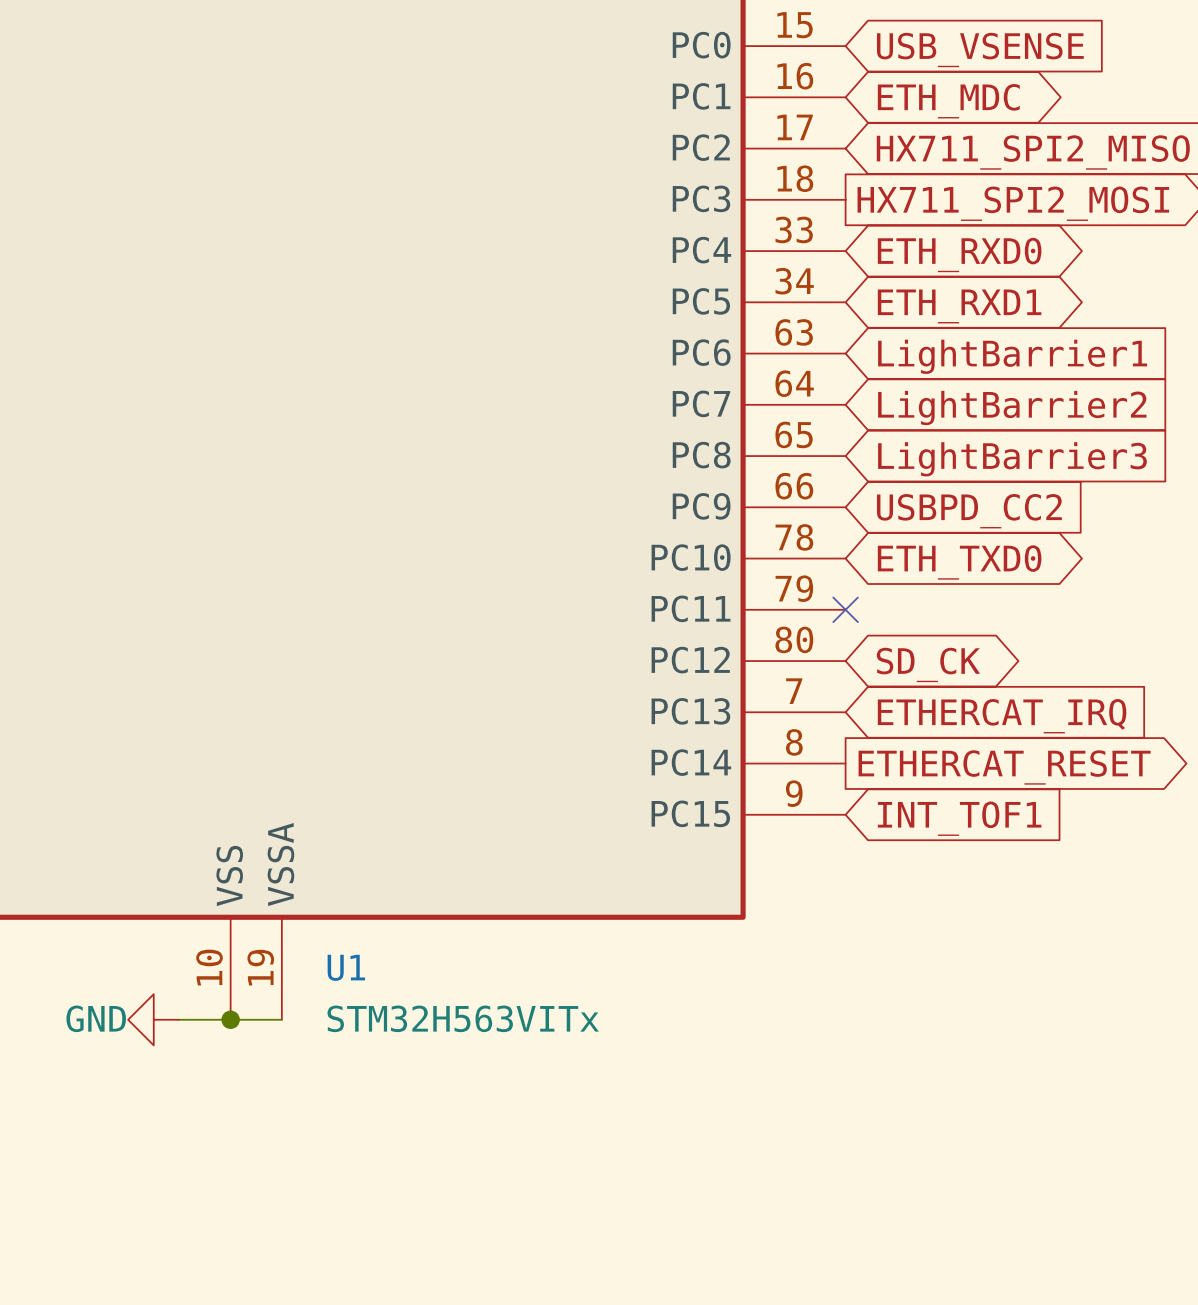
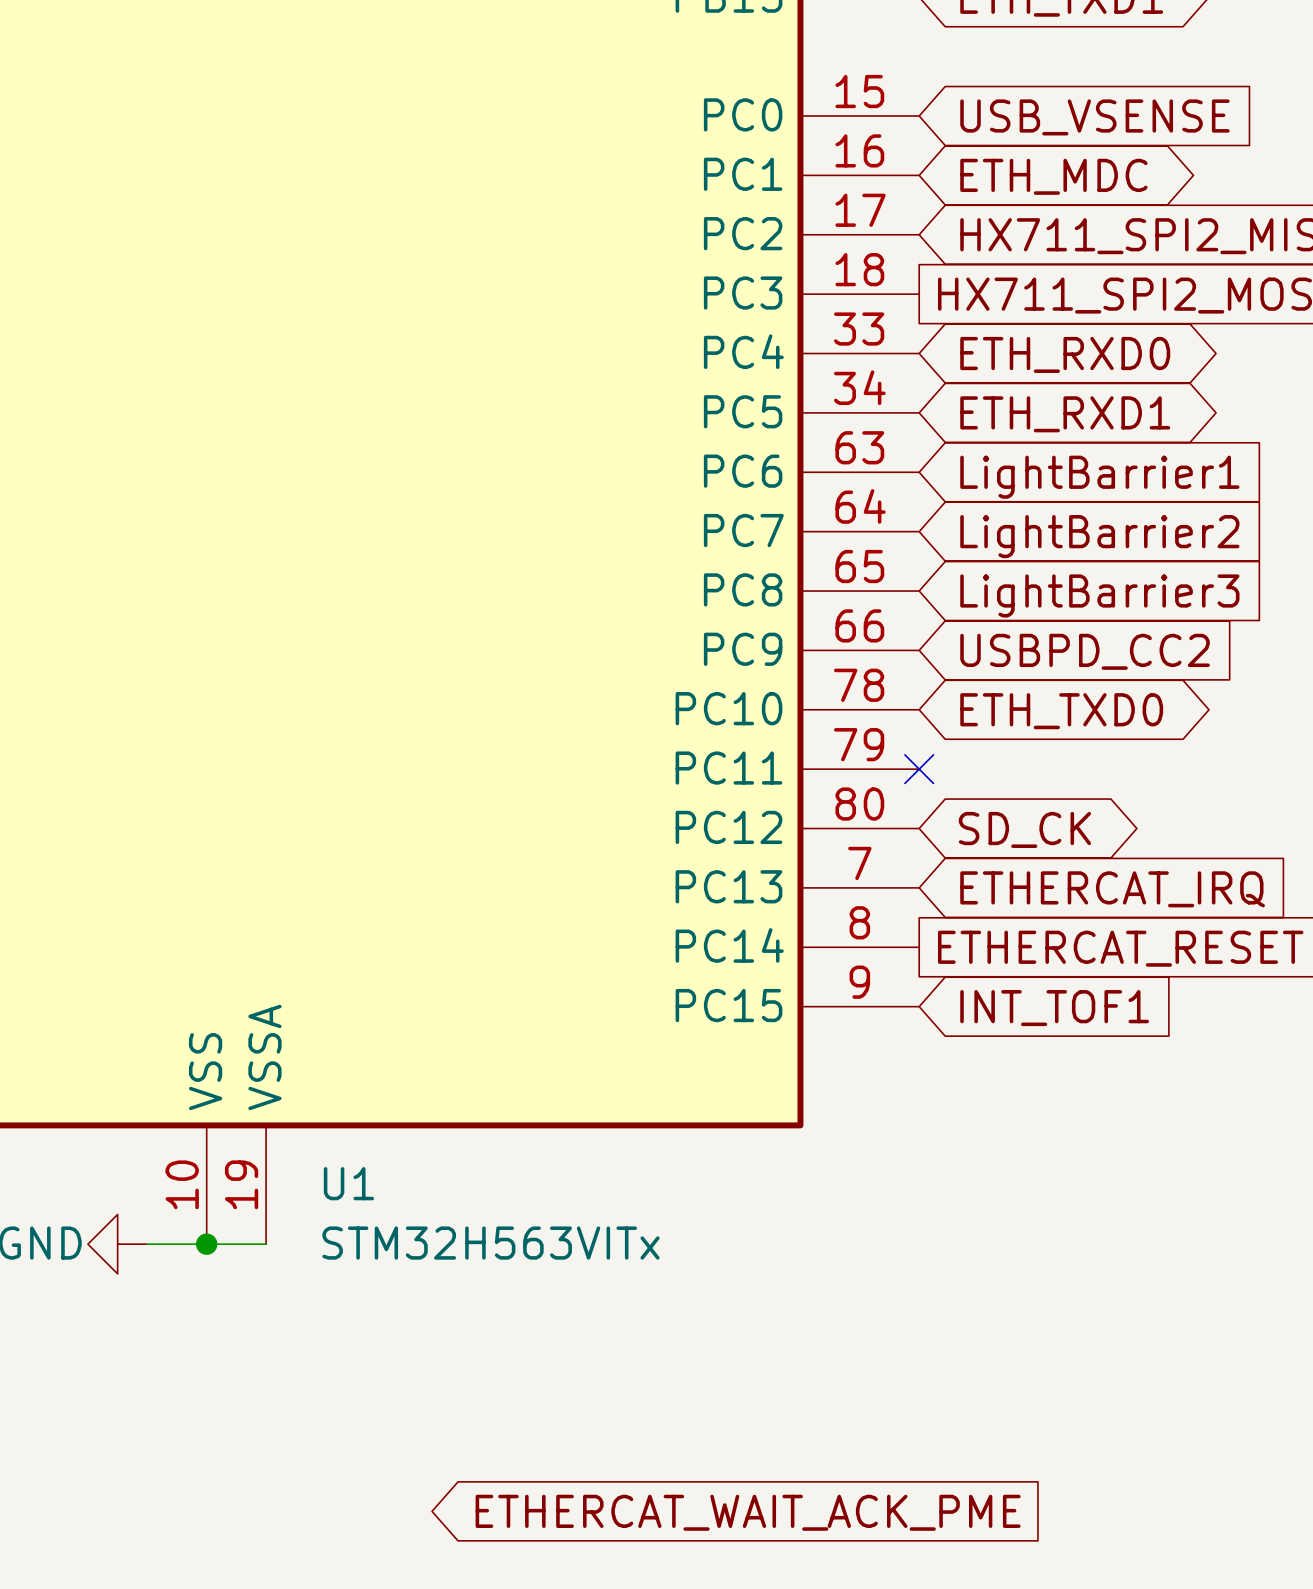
global label: none -> ETHERCAT_WAIT_ACK_PME (748, 1512)

